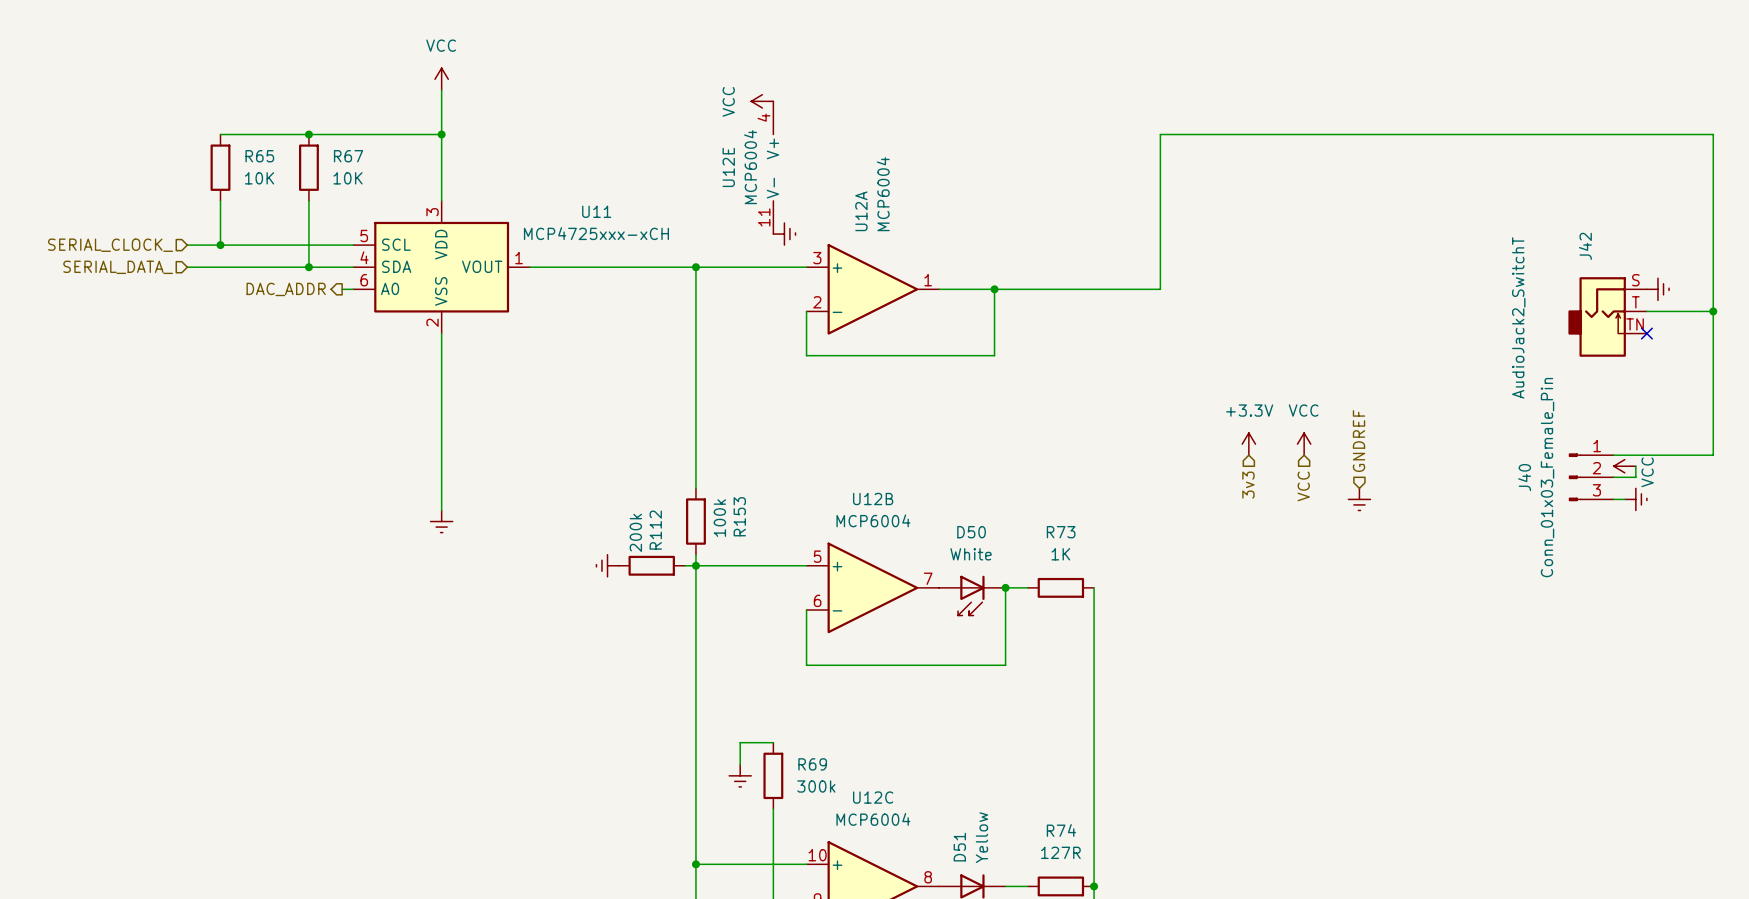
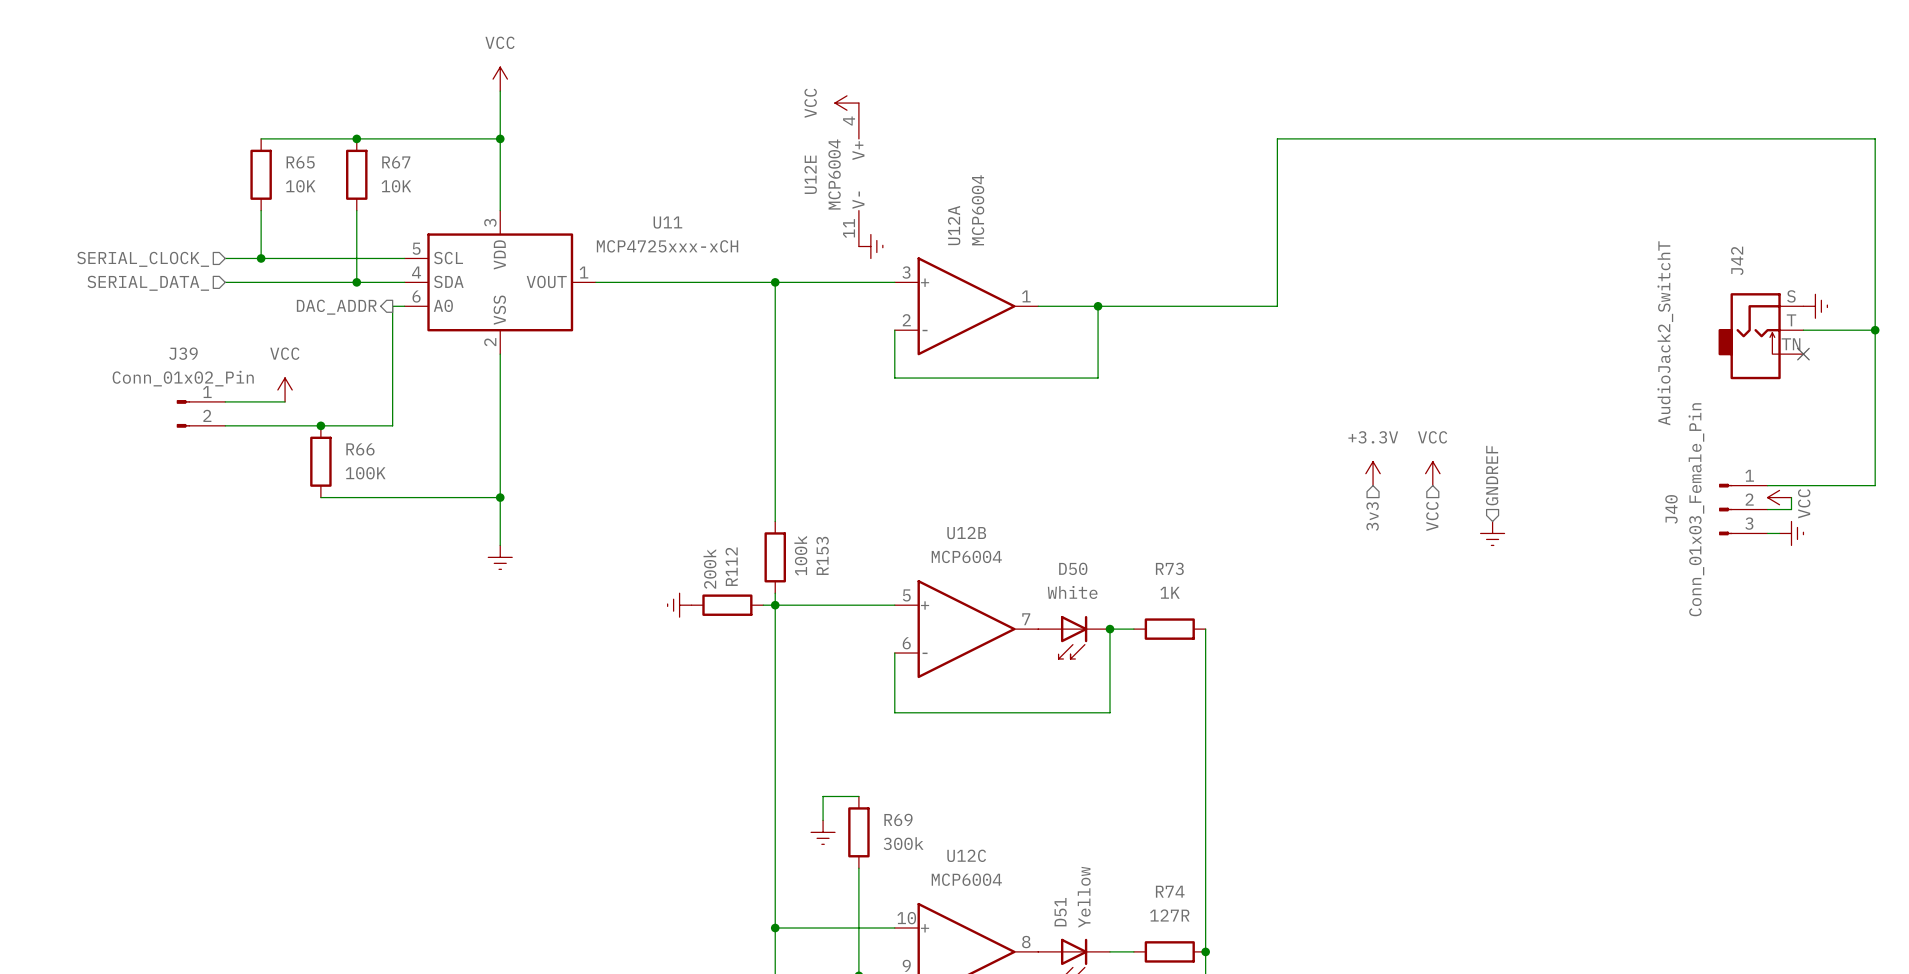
wire: none -> (392, 306) (392, 425) (225, 425)
power symbol: none -> VCC (285, 389)
wire: none -> (225, 401) (285, 401)
J39: none -> Conn_01x02_Pin (200, 413)
junction: none -> (320, 425)
R66: none -> 100K (320, 461)
wire: none -> (320, 497) (500, 497)
junction: none -> (500, 497)

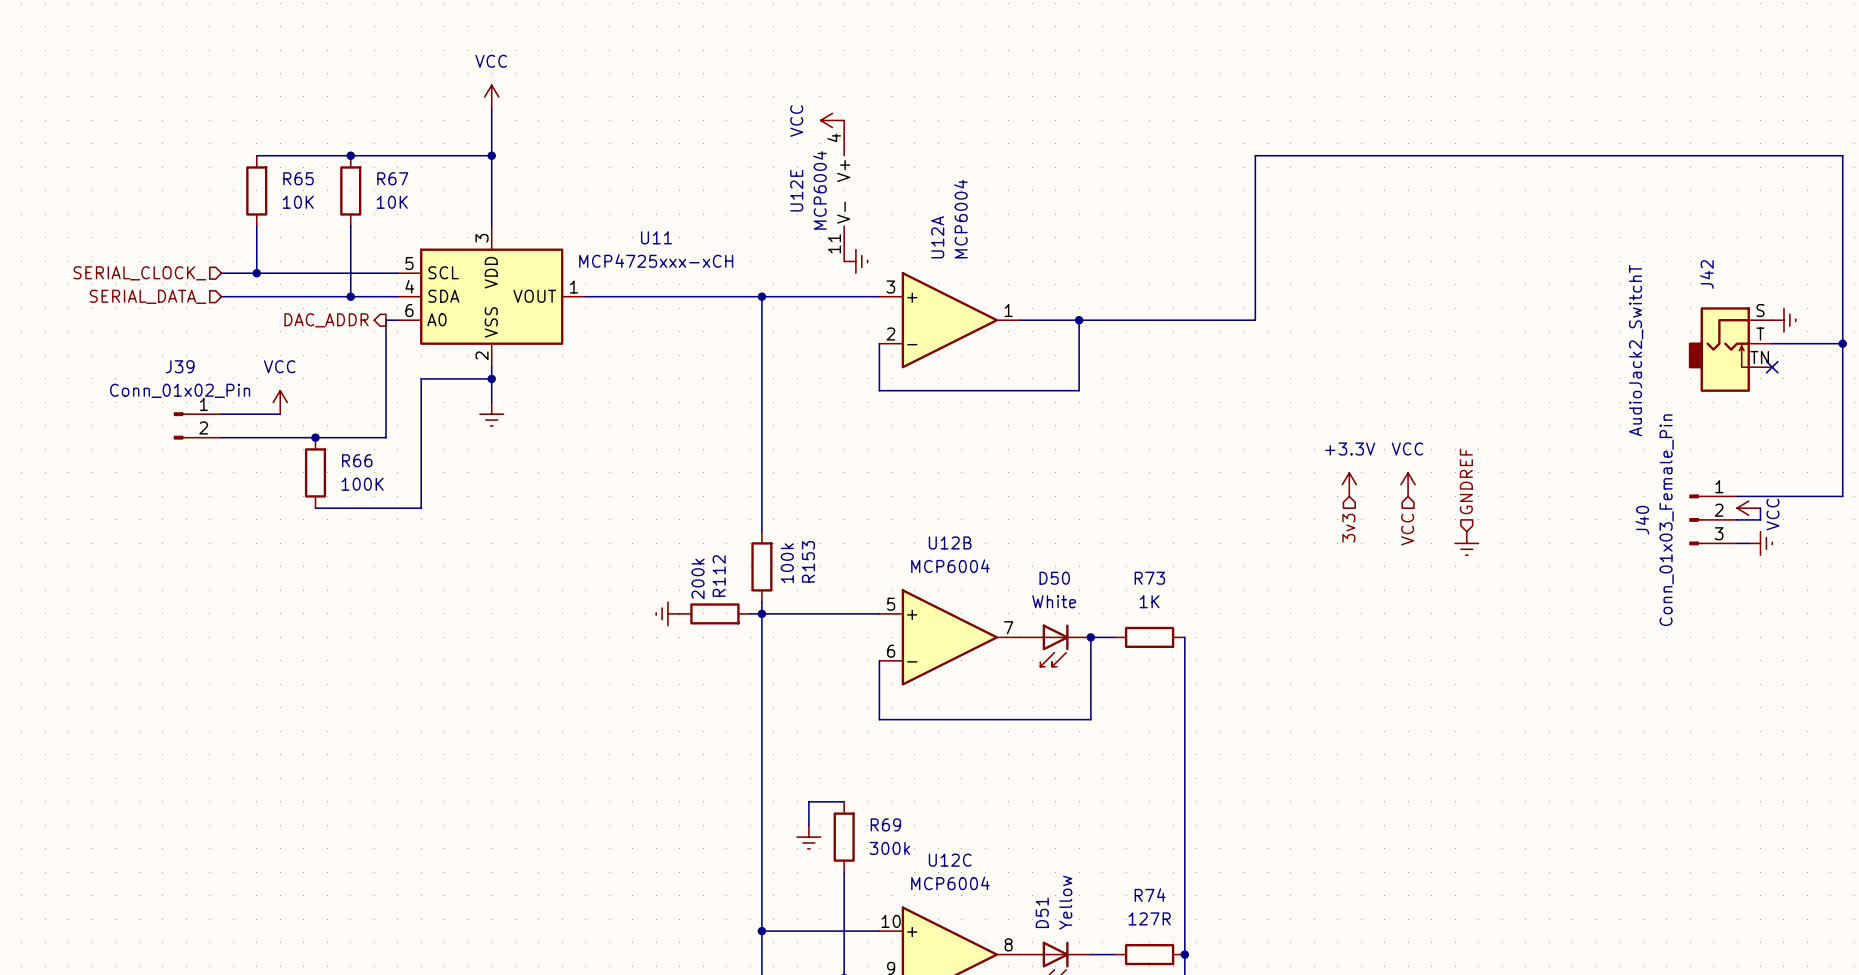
junction: none -> (491, 378)
wire: (500, 389) (500, 545) -> none
wire: (428, 497) (500, 497) -> (421, 508) (421, 378) (491, 378)
junction: (500, 497) -> none
power symbol position: (500, 557) -> (491, 414)

